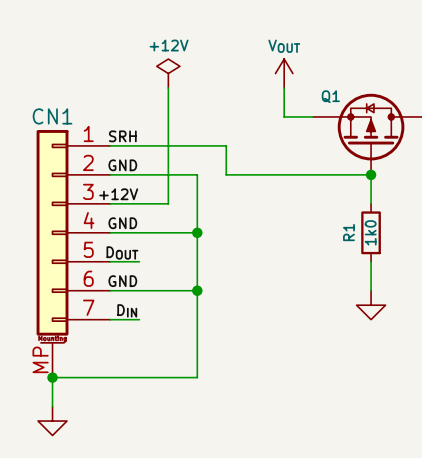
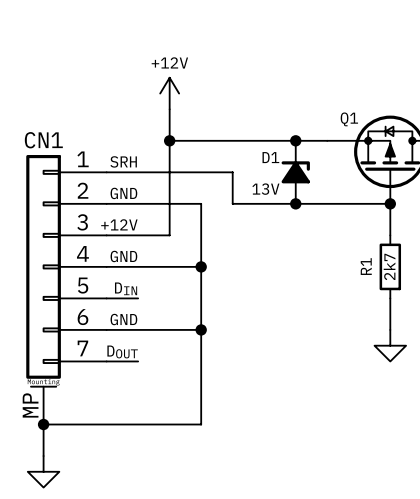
power symbol shape: [156, 59, 180, 89] -> [160, 77, 180, 110]
power symbol: VOUT (284, 73) -> none
wire: (284, 88) (284, 116) -> (169, 140) (295, 140)
junction: none -> (169, 140)
junction: none -> (295, 140)
D1: none -> 13V (295, 172)
junction: none -> (295, 203)
R1 value: 1k0 (370, 232) -> 2k7 (389, 266)
label: DOUT (122, 252) -> DIN (126, 288)
label: DIN (127, 310) -> DOUT (122, 351)

